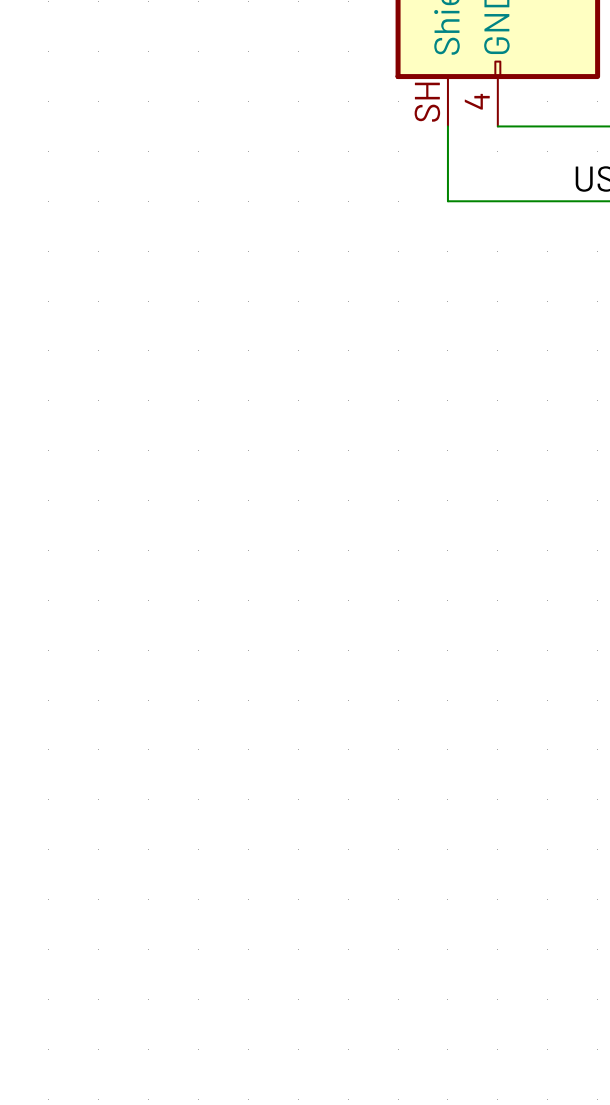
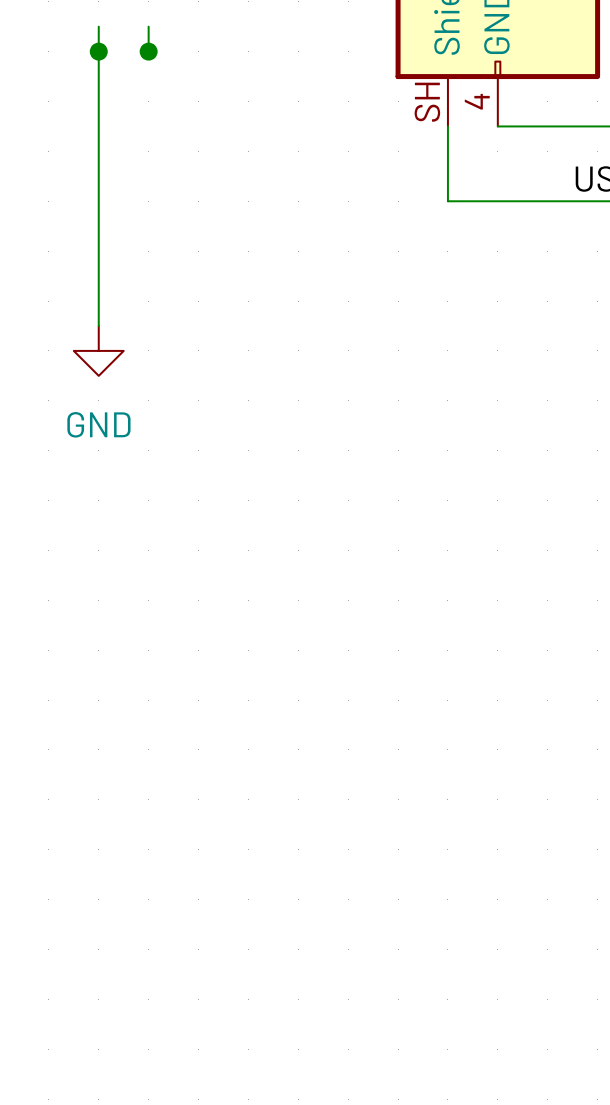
wire: none -> (98, 26) (98, 325)
wire: none -> (148, 26) (148, 51)
junction: none -> (98, 51)
junction: none -> (148, 51)
power symbol: none -> GND (98, 350)

